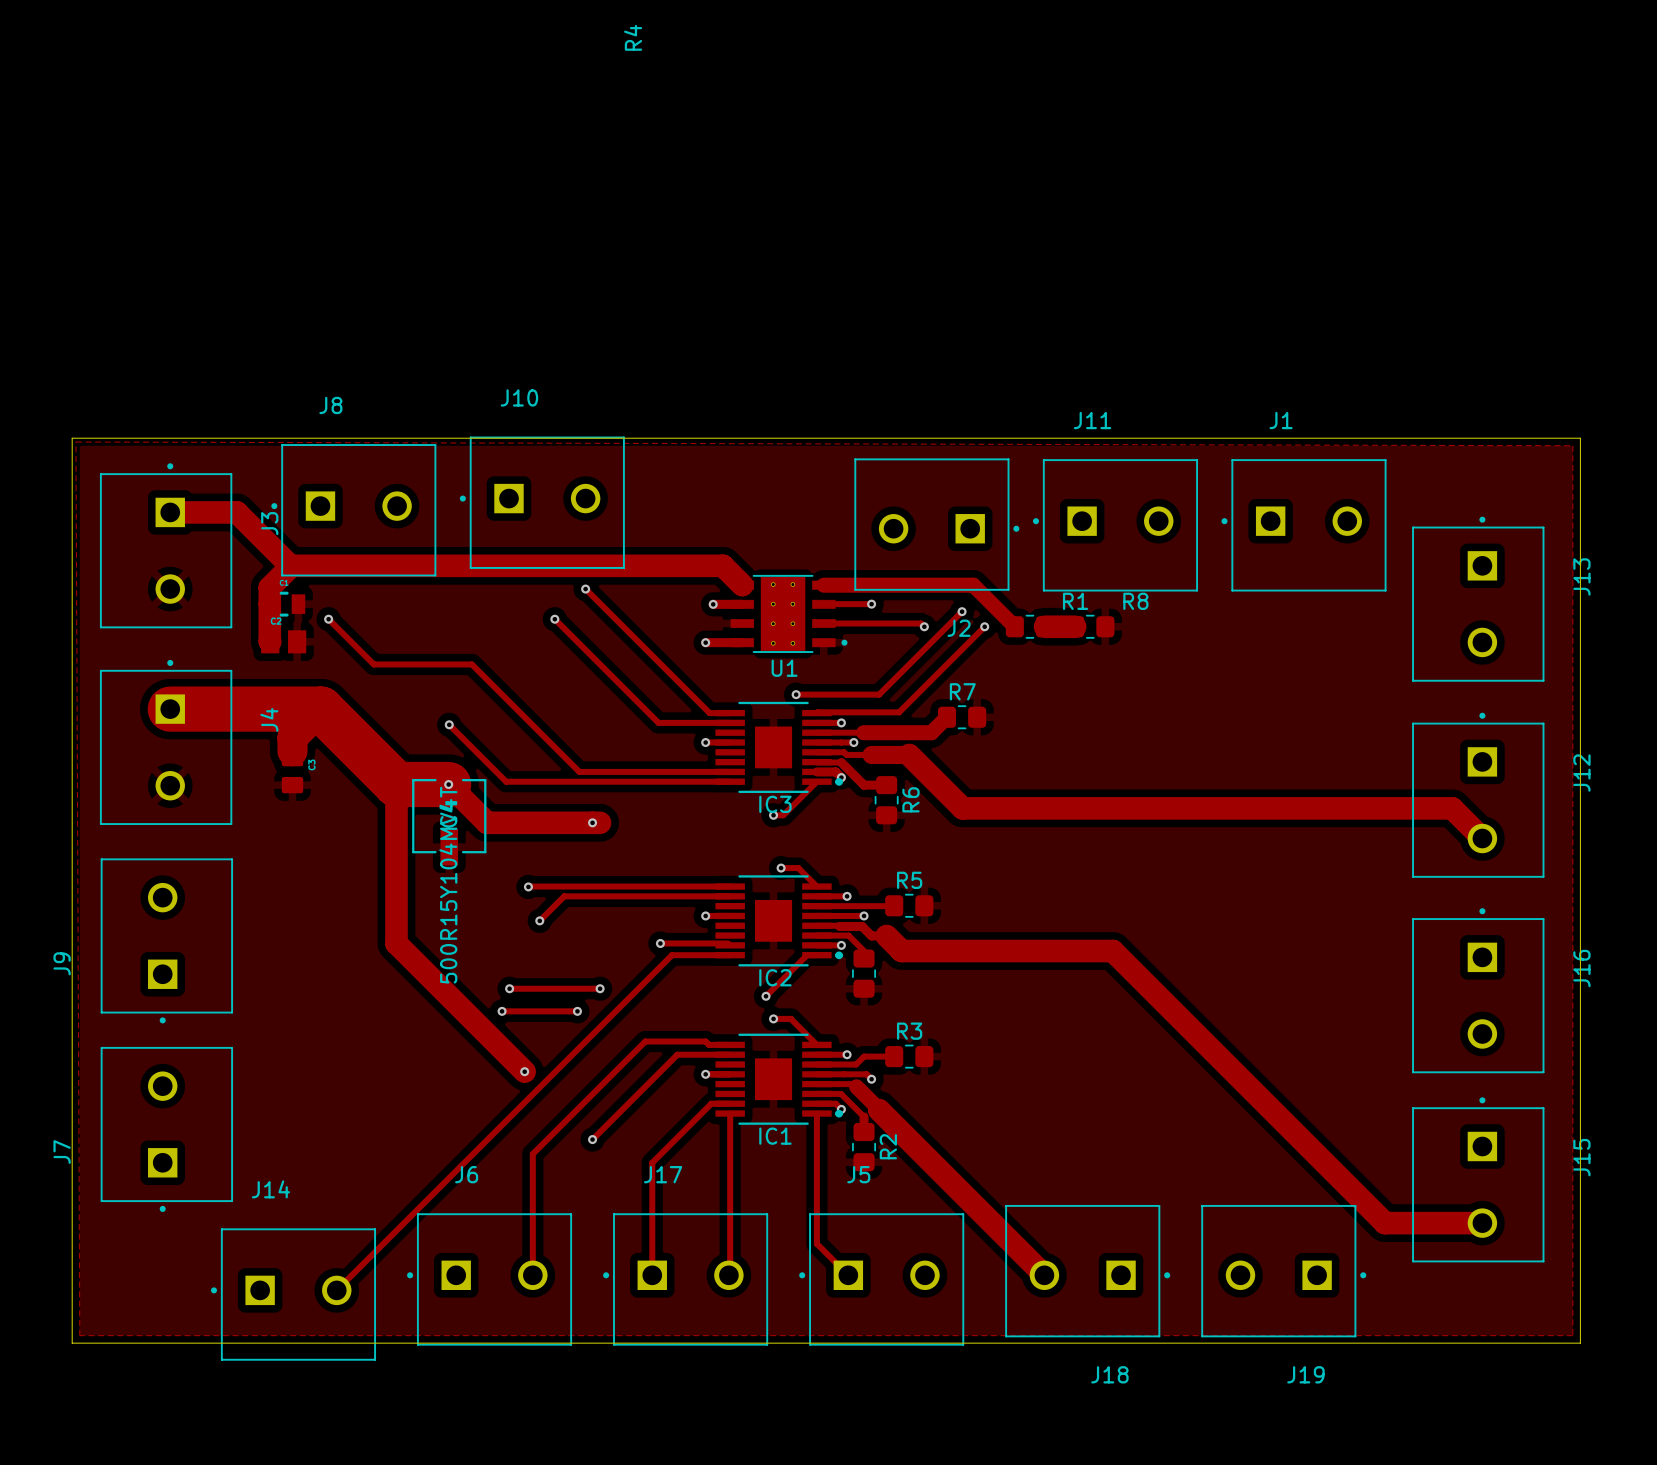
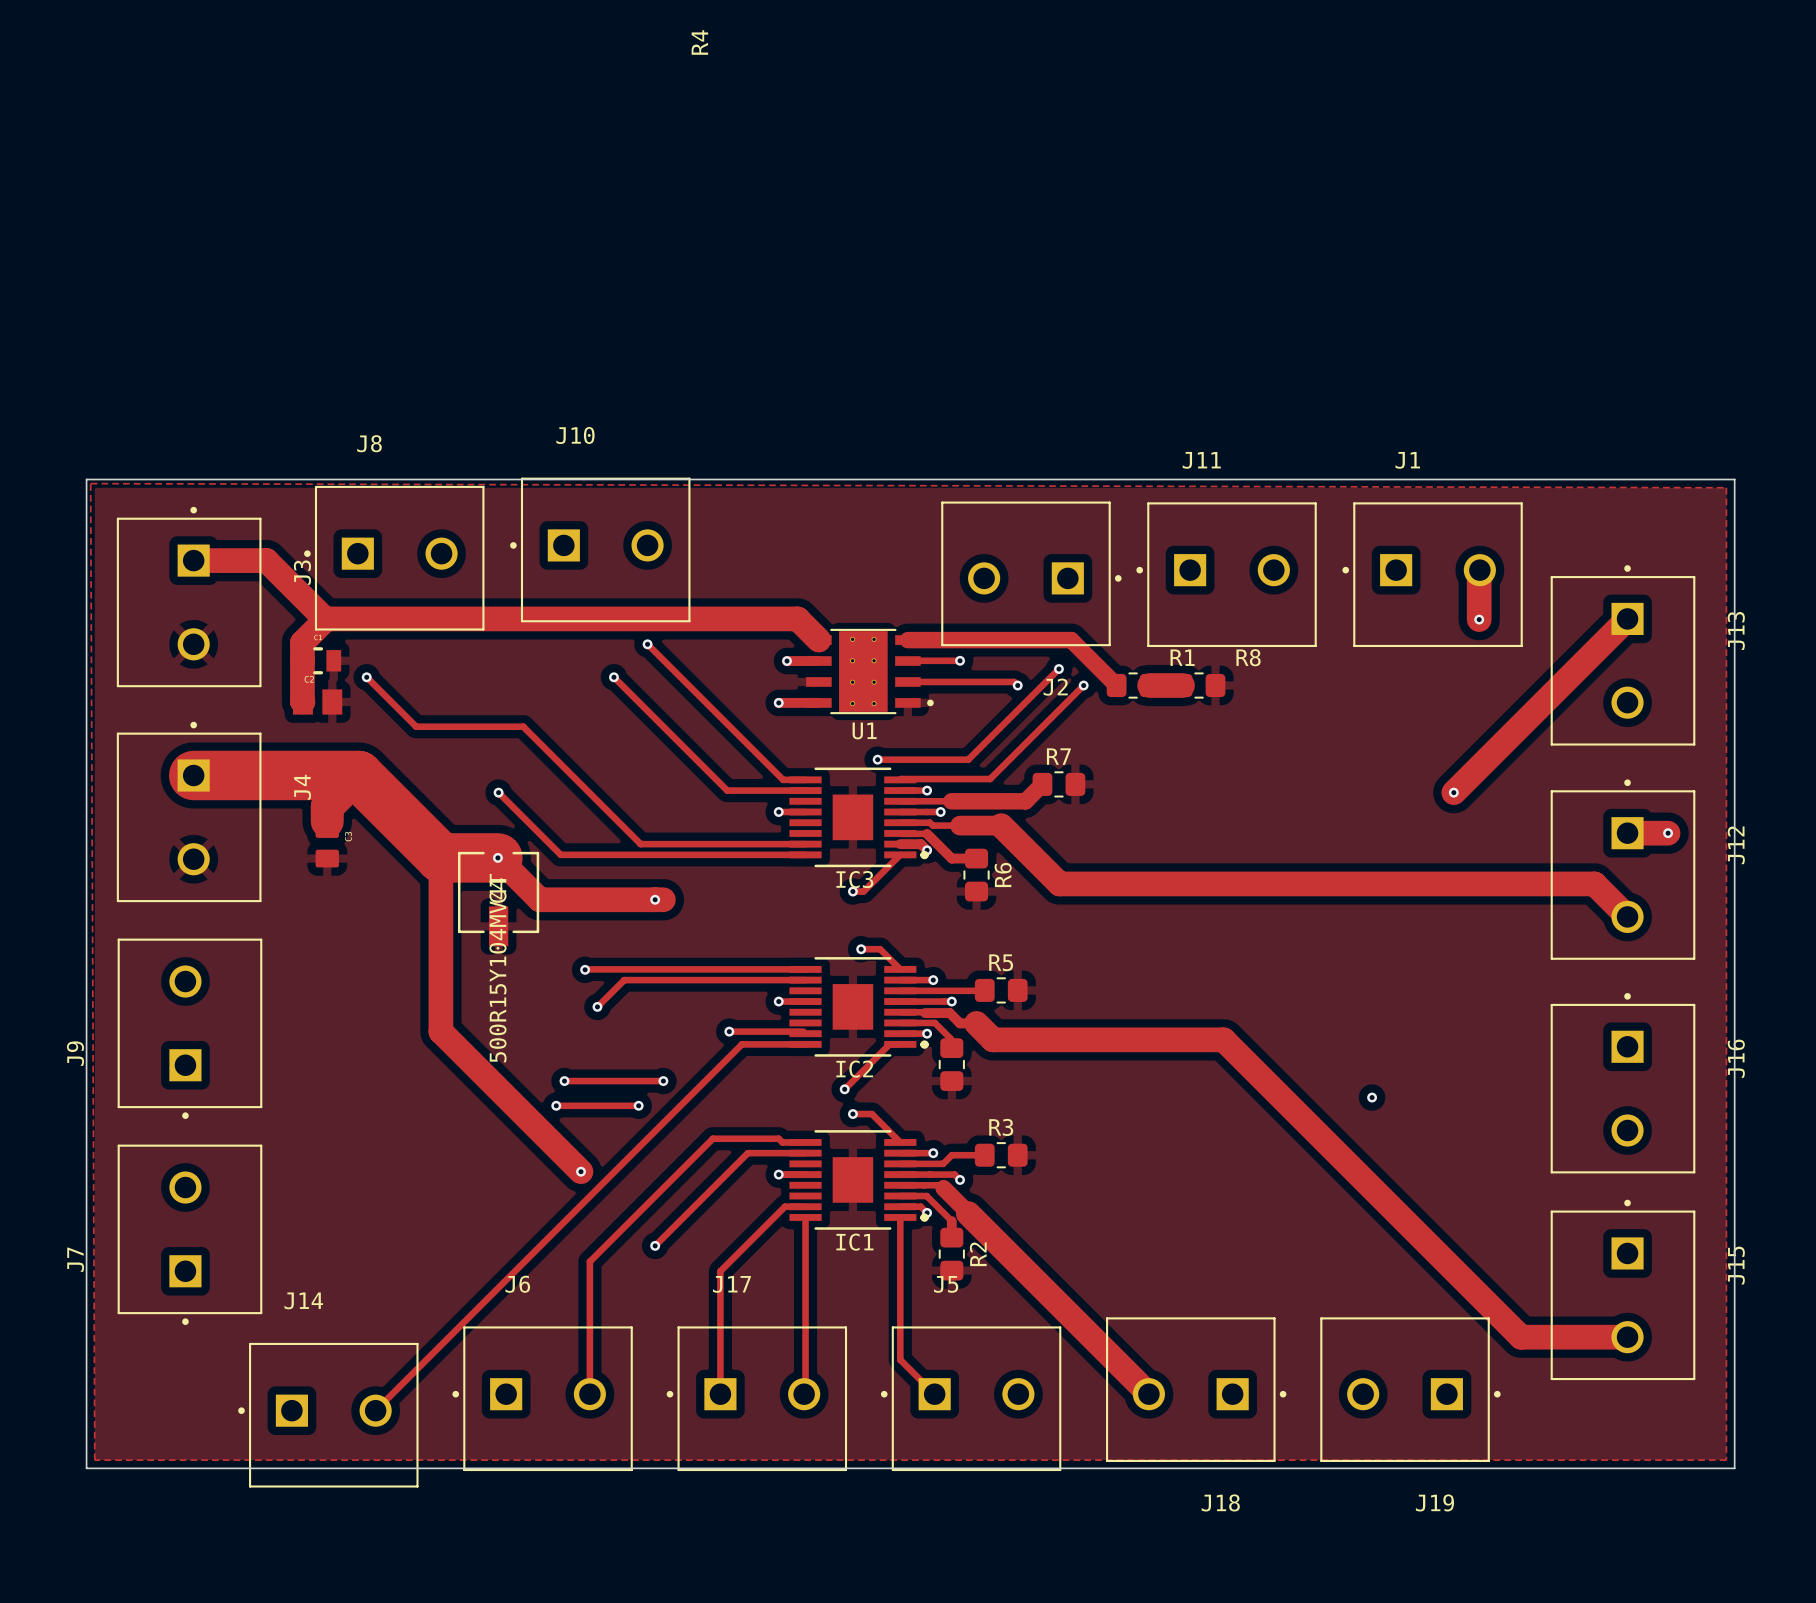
track: none -> (1479, 570) (1479, 619)
track: none -> (1627, 618) (1453, 792)
via: none -> (1479, 619)
via: none -> (1453, 792)
track: none -> (1627, 833) (1668, 833)
via: none -> (1668, 833)
via: none -> (1372, 1097)

